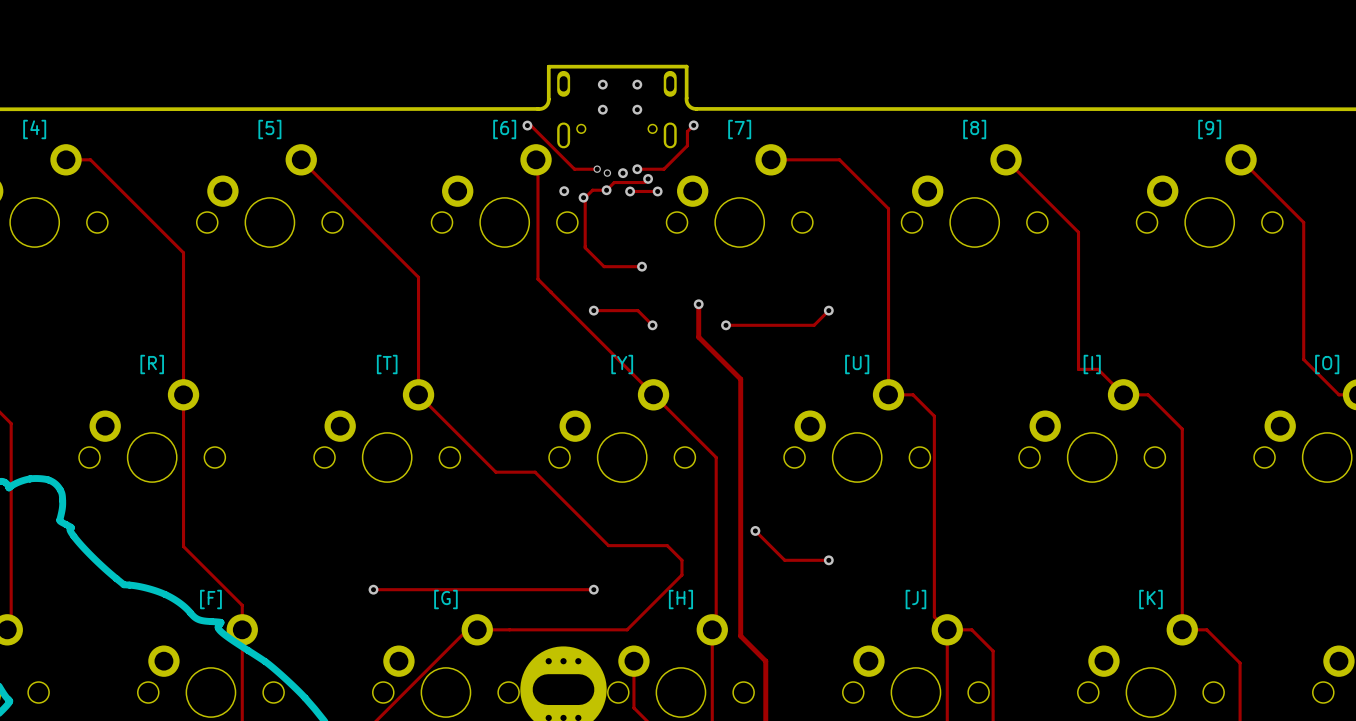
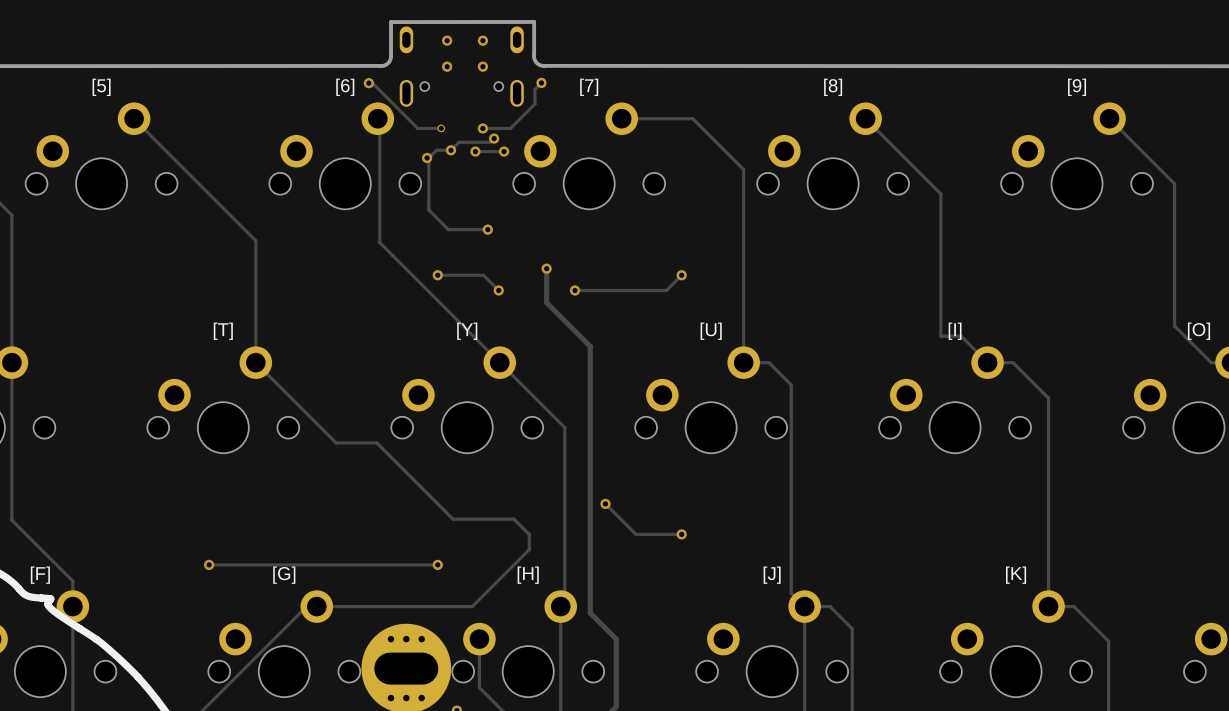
via: (607, 173) -> none
via: (622, 173) -> none
via: (564, 191) -> none

